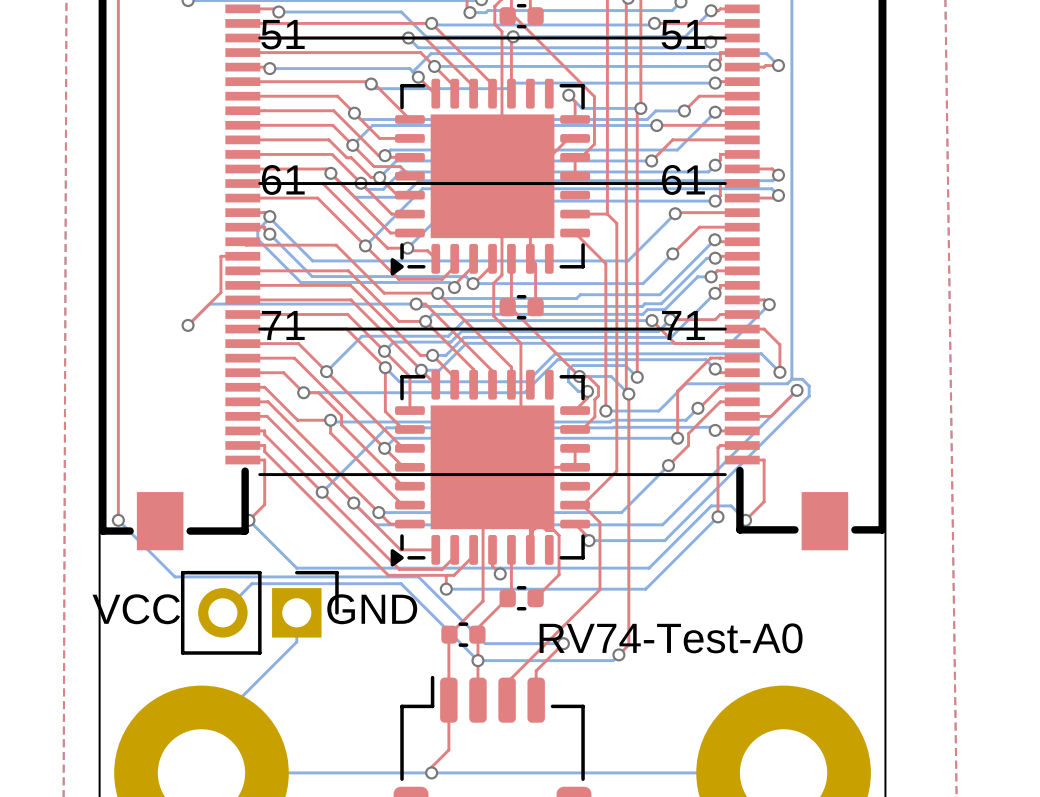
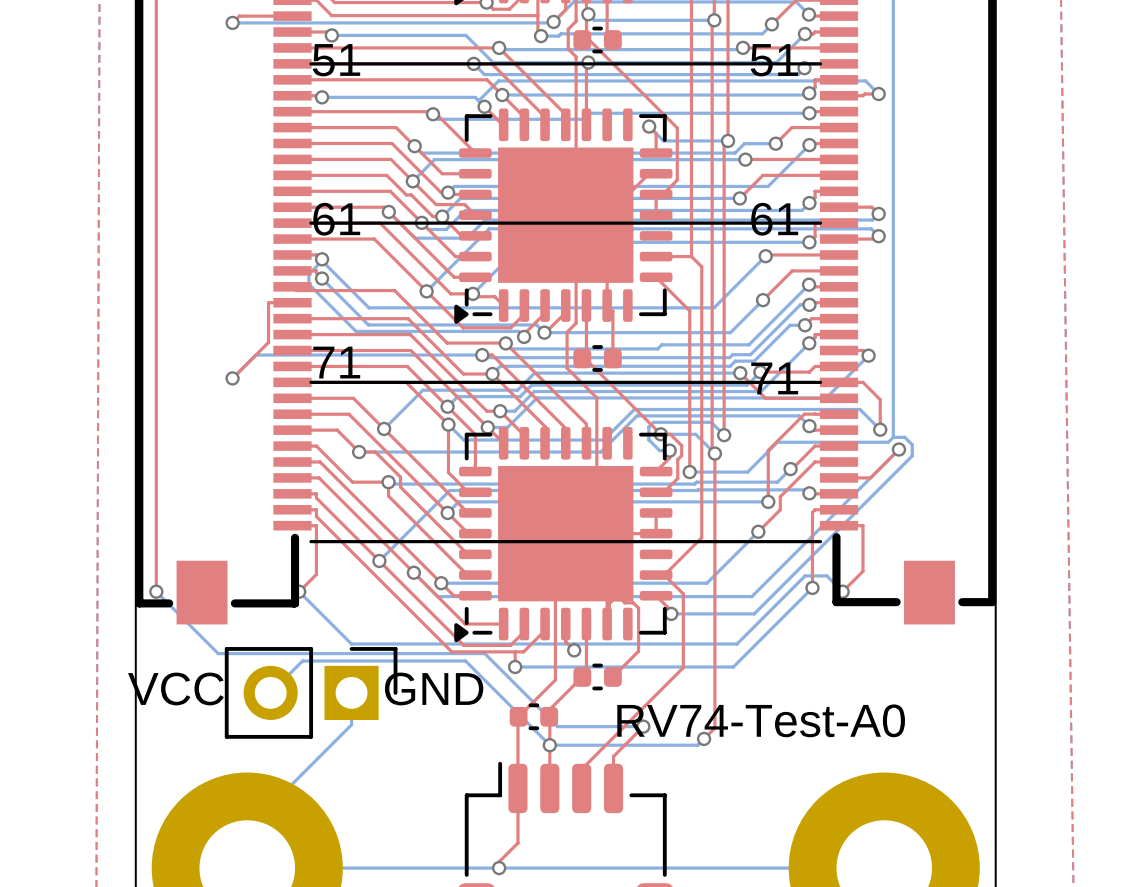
text position: 71 (283, 325) -> 71 (336, 362)

